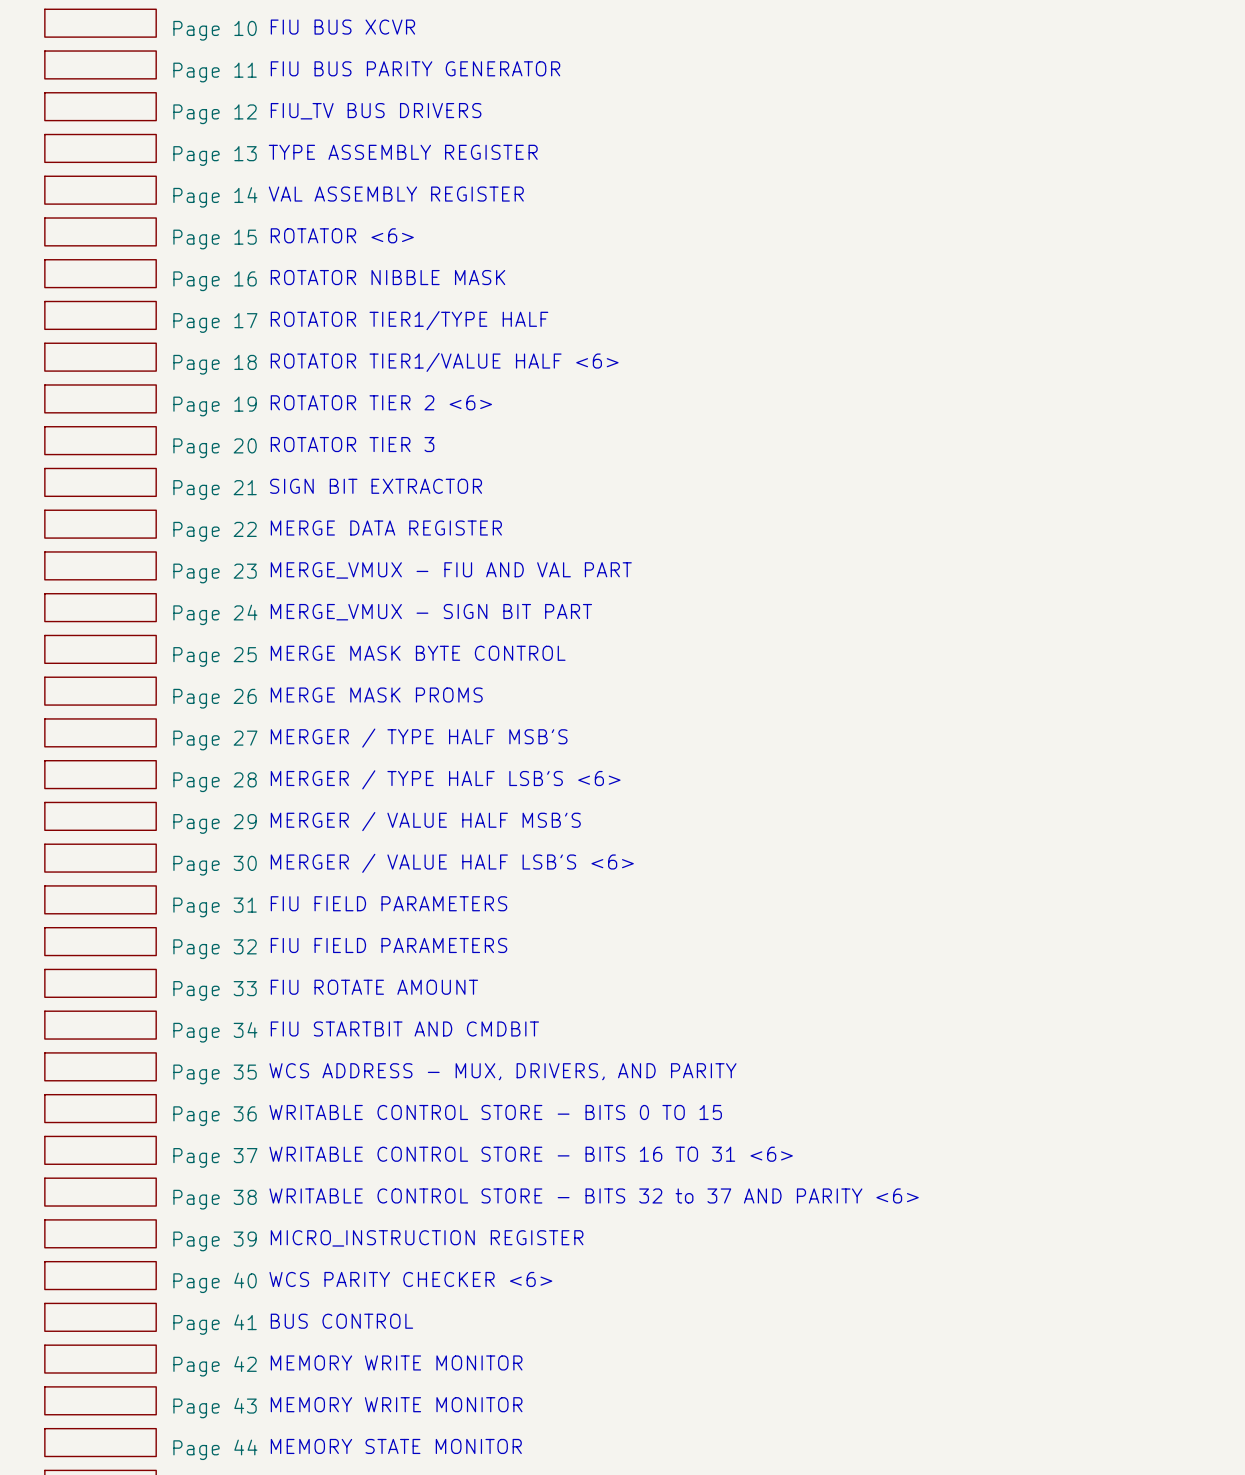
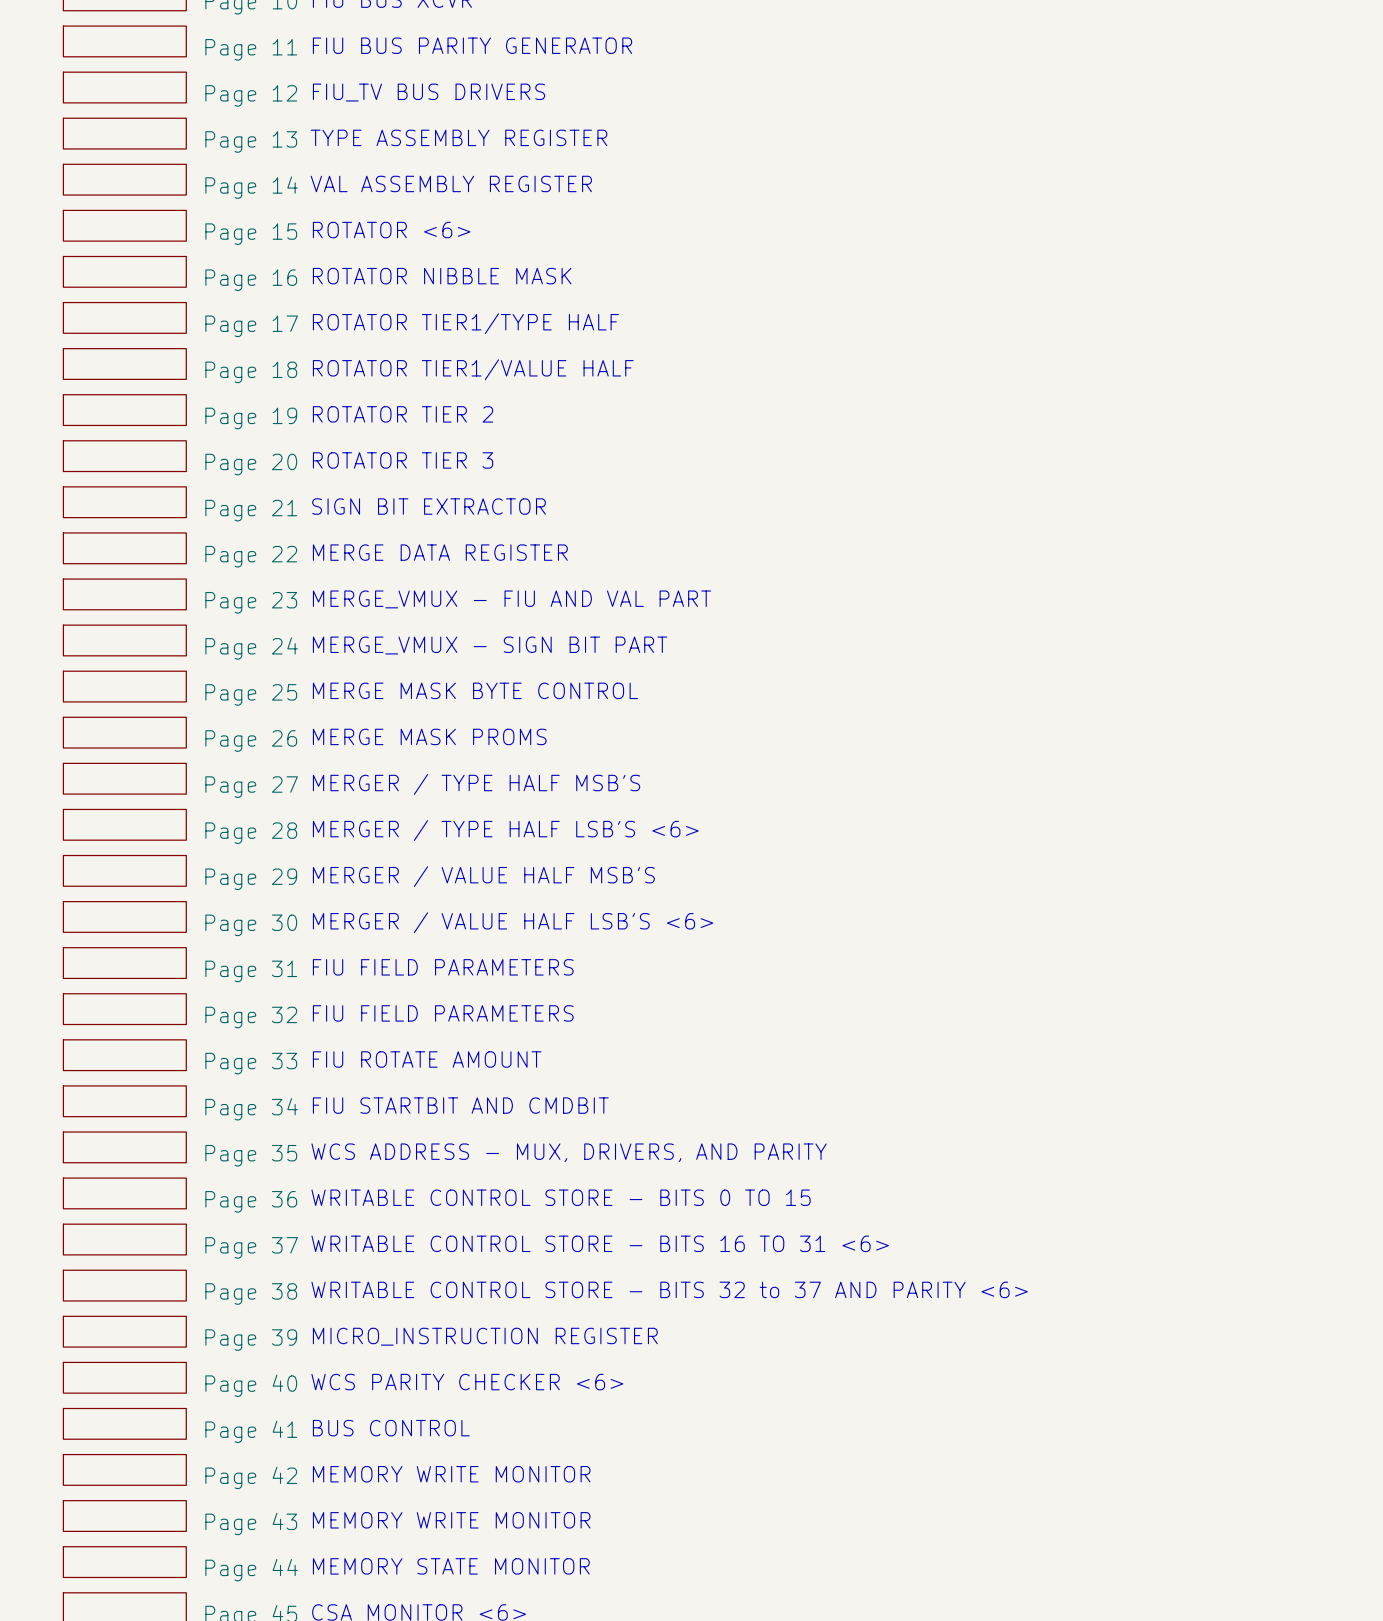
text: ROTATOR TIER1/VALUE HALF <6> (444, 362) -> ROTATOR TIER1/VALUE HALF (473, 369)
text: ROTATOR TIER 2 <6> (381, 402) -> ROTATOR TIER 2 (403, 414)

